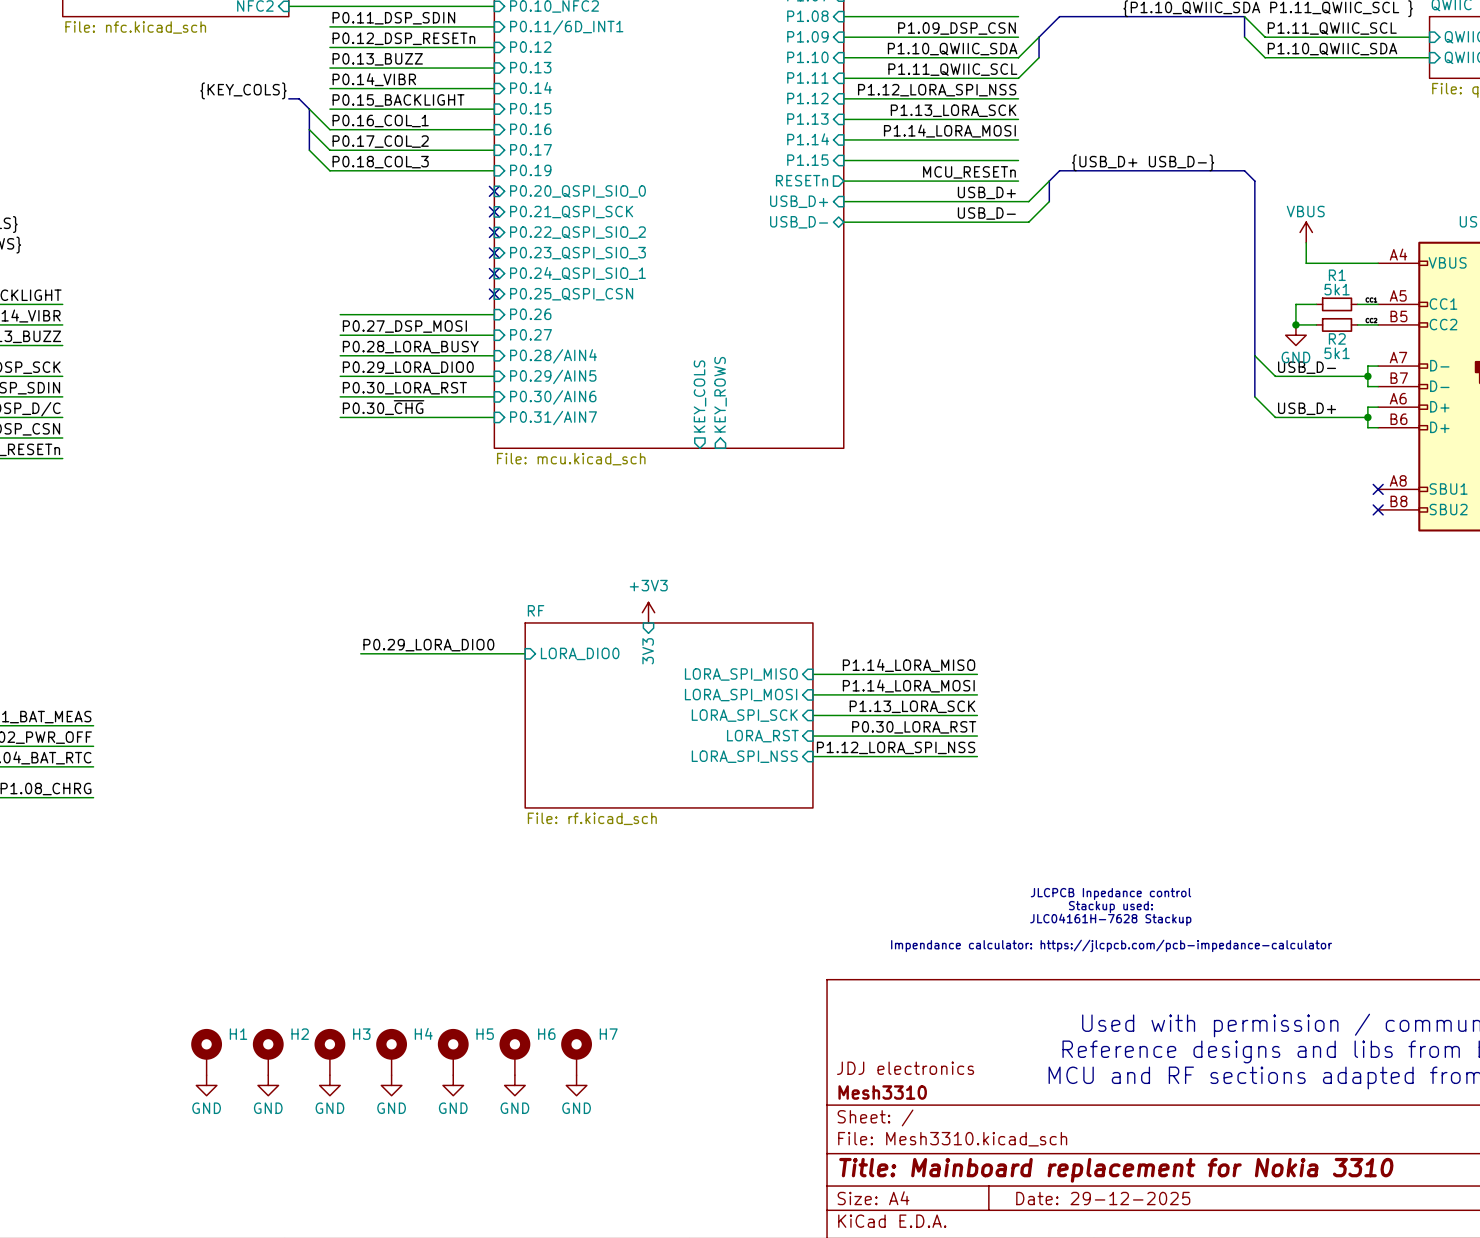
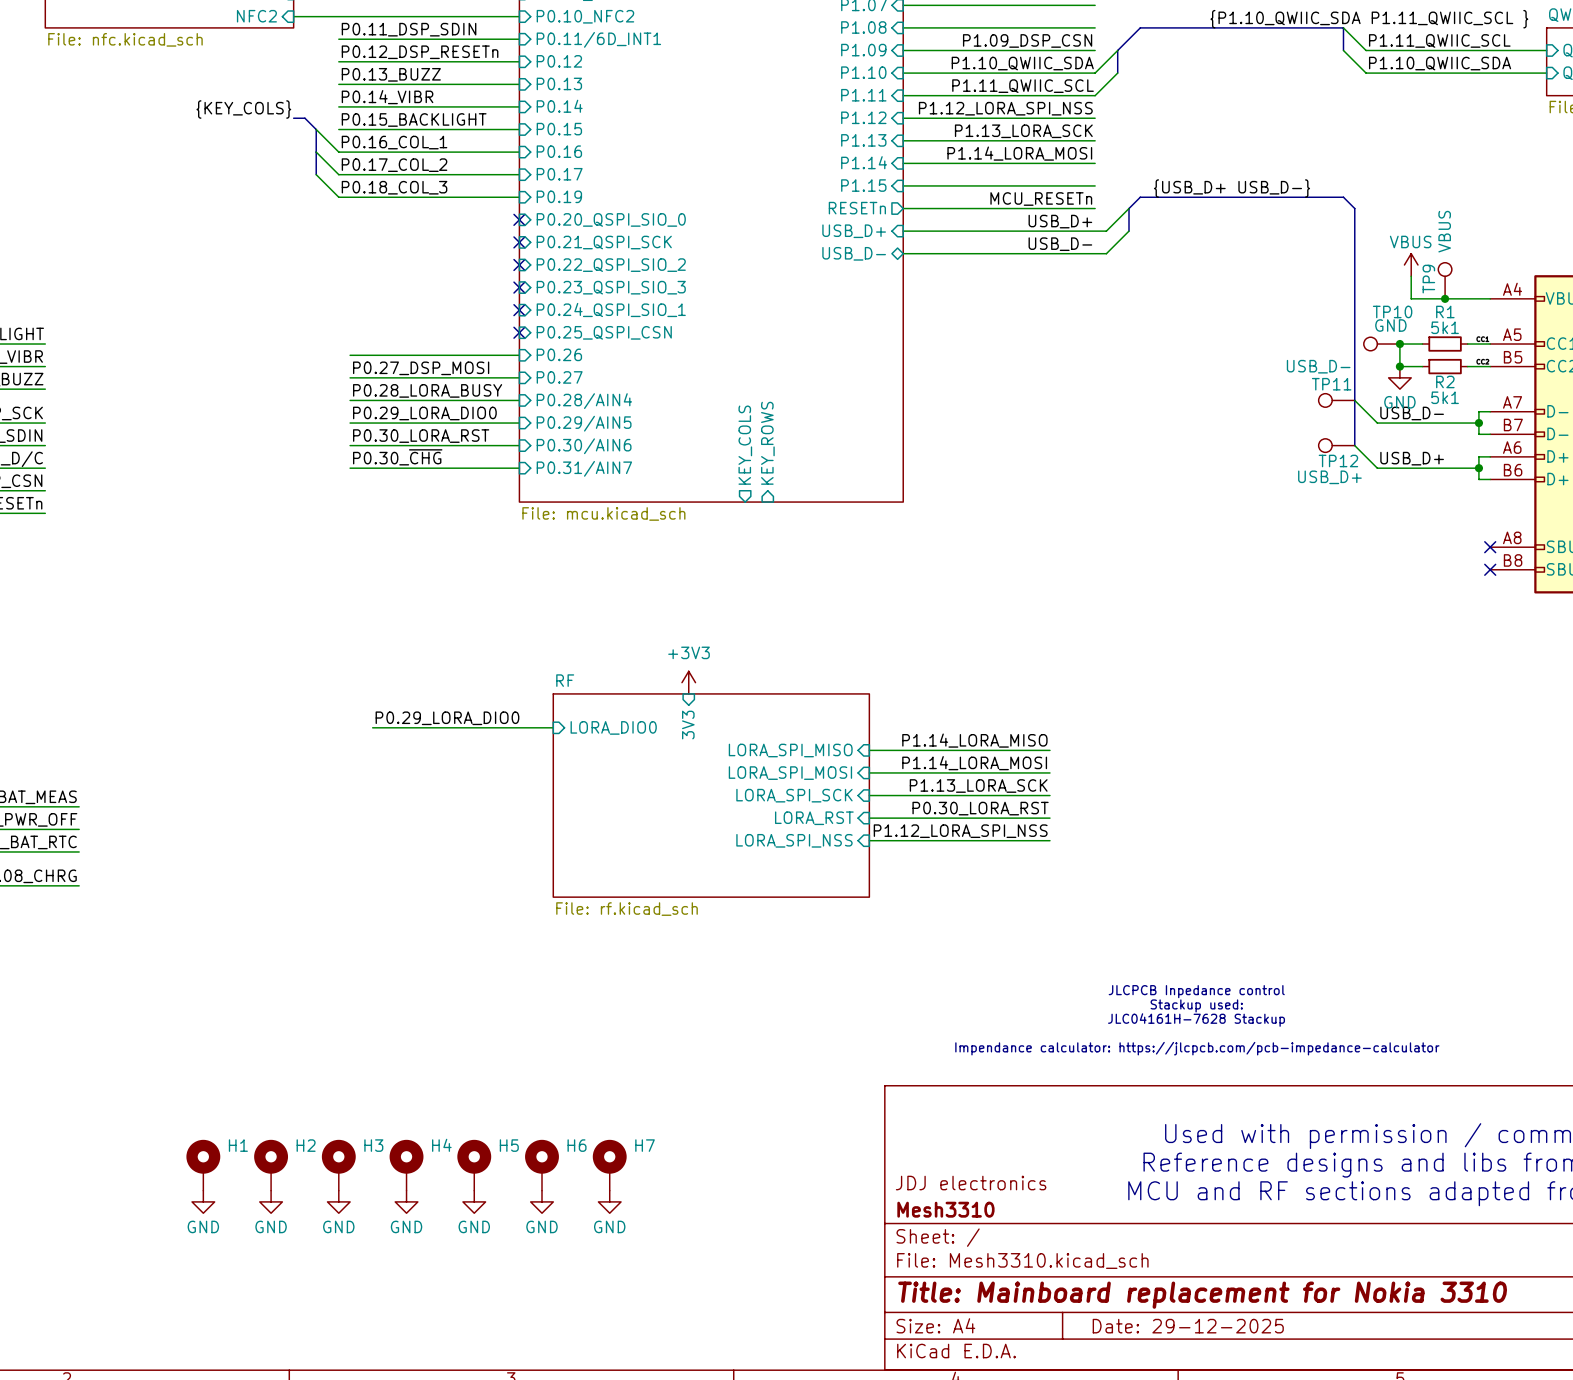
TP9: none -> VBUS (1445, 280)
junction: none -> (1445, 298)
TP10: none -> GND (1381, 344)
junction: none -> (1399, 344)
TP11: none -> USB_D- (1336, 400)
TP12: none -> USB_D+ (1336, 445)

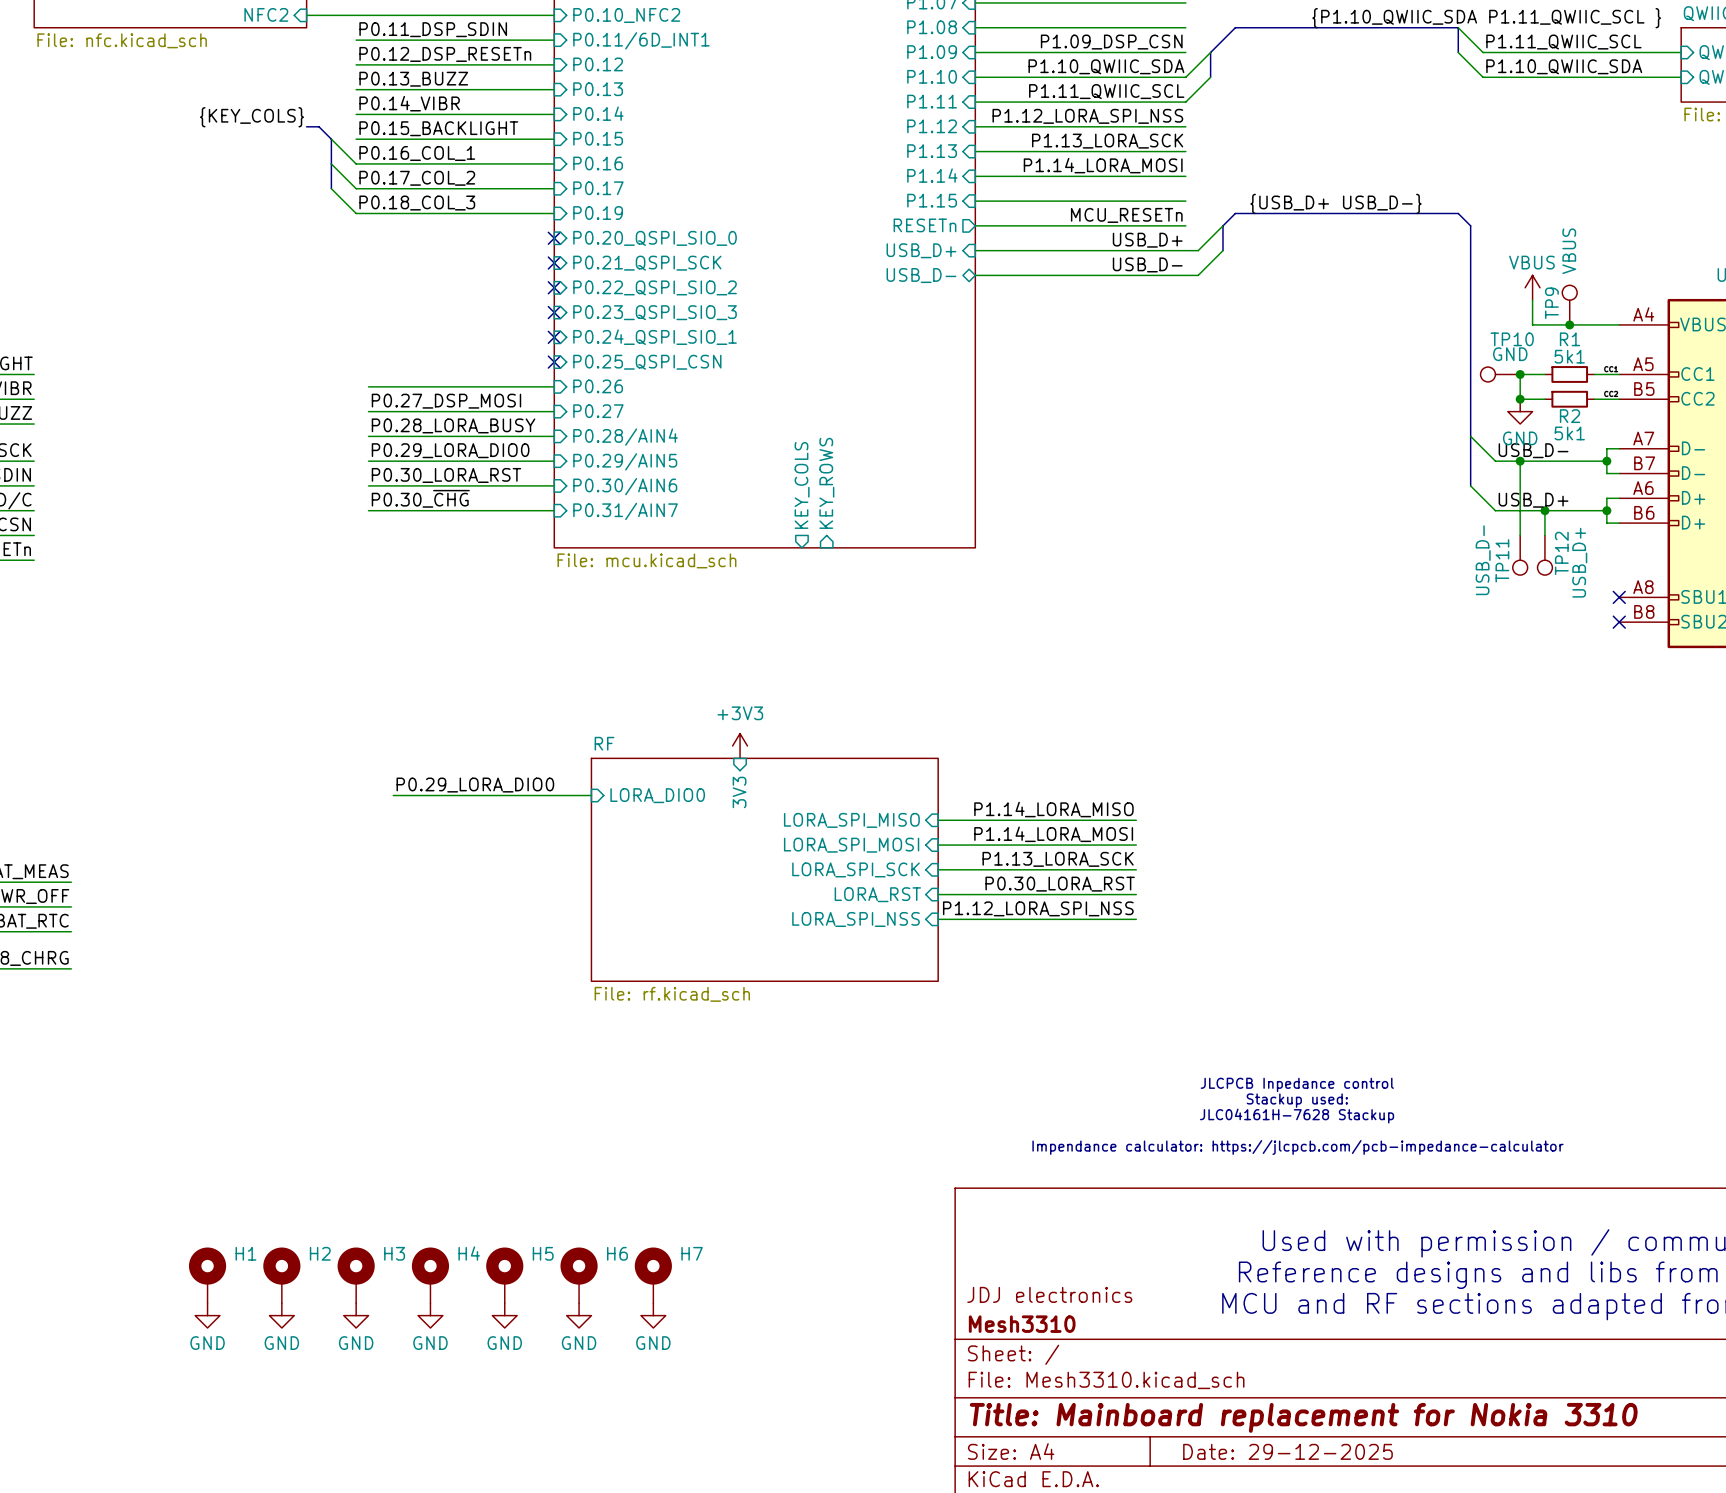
TP11 rotation: 0° (1325, 400) -> 90° counterclockwise (1520, 567)
TP11 position: (1336, 400) -> (1520, 555)
wire: none -> (1520, 461) (1520, 535)
junction: none -> (1520, 461)
TP12 rotation: 0° (1325, 445) -> 90° counterclockwise (1544, 567)
TP12 position: (1336, 445) -> (1544, 555)
wire: none -> (1544, 510) (1544, 535)
junction: none -> (1544, 510)

